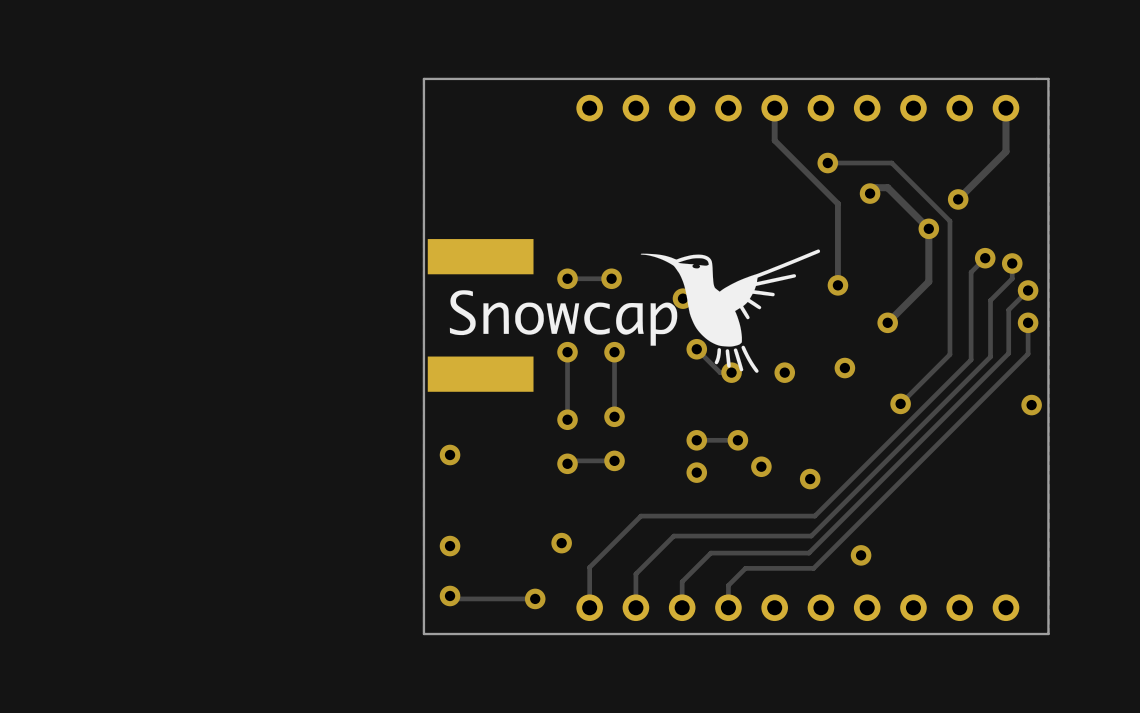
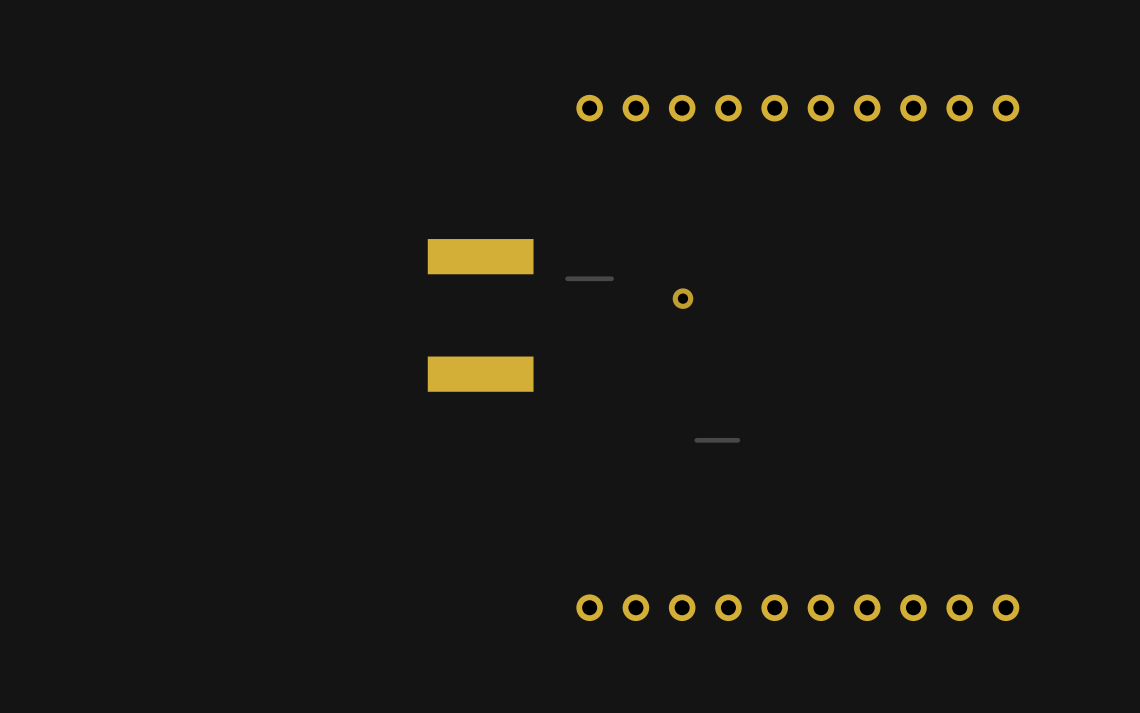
board edge: (1048, 78) (423, 78) (423, 634) (1048, 634) (1048, 78) -> none
track: (774, 108) (774, 140) (837, 203) (837, 285) -> none
track: (1005, 108) (1005, 151) (958, 199) -> none
track: (827, 163) (891, 163) (949, 221) (949, 354) (900, 403) -> none
via: (827, 163) -> none
track: (870, 193) (875, 187) (887, 187) (928, 228) (928, 281) (887, 322) -> none
via: (870, 193) -> none
via: (958, 199) -> none
via: (928, 228) -> none
drawing: [449, 249, 821, 373] -> none
track: (985, 258) (971, 272) (971, 359) (814, 516) (640, 516) (589, 567) (589, 607) -> none
via: (985, 258) -> none
track: (1012, 263) (1012, 278) (990, 300) (990, 356) (811, 536) (673, 536) (635, 574) (635, 607) -> none
via: (1012, 263) -> none
via: (567, 278) -> none
via: (611, 278) -> none
via: (837, 285) -> none
track: (1028, 290) (1008, 309) (1008, 353) (808, 553) (710, 553) (682, 581) (682, 607) -> none
via: (1028, 290) -> none
via: (887, 322) -> none
track: (1028, 322) (1028, 353) (813, 568) (745, 568) (728, 585) (728, 607) -> none
via: (1028, 322) -> none
track: (696, 349) (720, 372) (731, 372) -> none
via: (696, 349) -> none
track: (567, 352) (567, 419) -> none
via: (567, 352) -> none
track: (614, 352) (614, 416) -> none
via: (614, 352) -> none
via: (844, 368) -> none
via: (731, 372) -> none
via: (784, 372) -> none
via: (900, 403) -> none
via: (1031, 405) -> none
via: (614, 416) -> none
via: (567, 419) -> none
via: (696, 440) -> none
via: (737, 440) -> none
via: (450, 454) -> none
track: (614, 460) (570, 460) (567, 463) -> none
via: (614, 460) -> none
via: (567, 463) -> none
via: (761, 466) -> none
via: (696, 472) -> none
via: (810, 479) -> none
via: (561, 543) -> none
via: (450, 546) -> none
via: (861, 555) -> none
track: (450, 595) (452, 598) (535, 598) -> none
via: (450, 595) -> none
via: (535, 598) -> none

